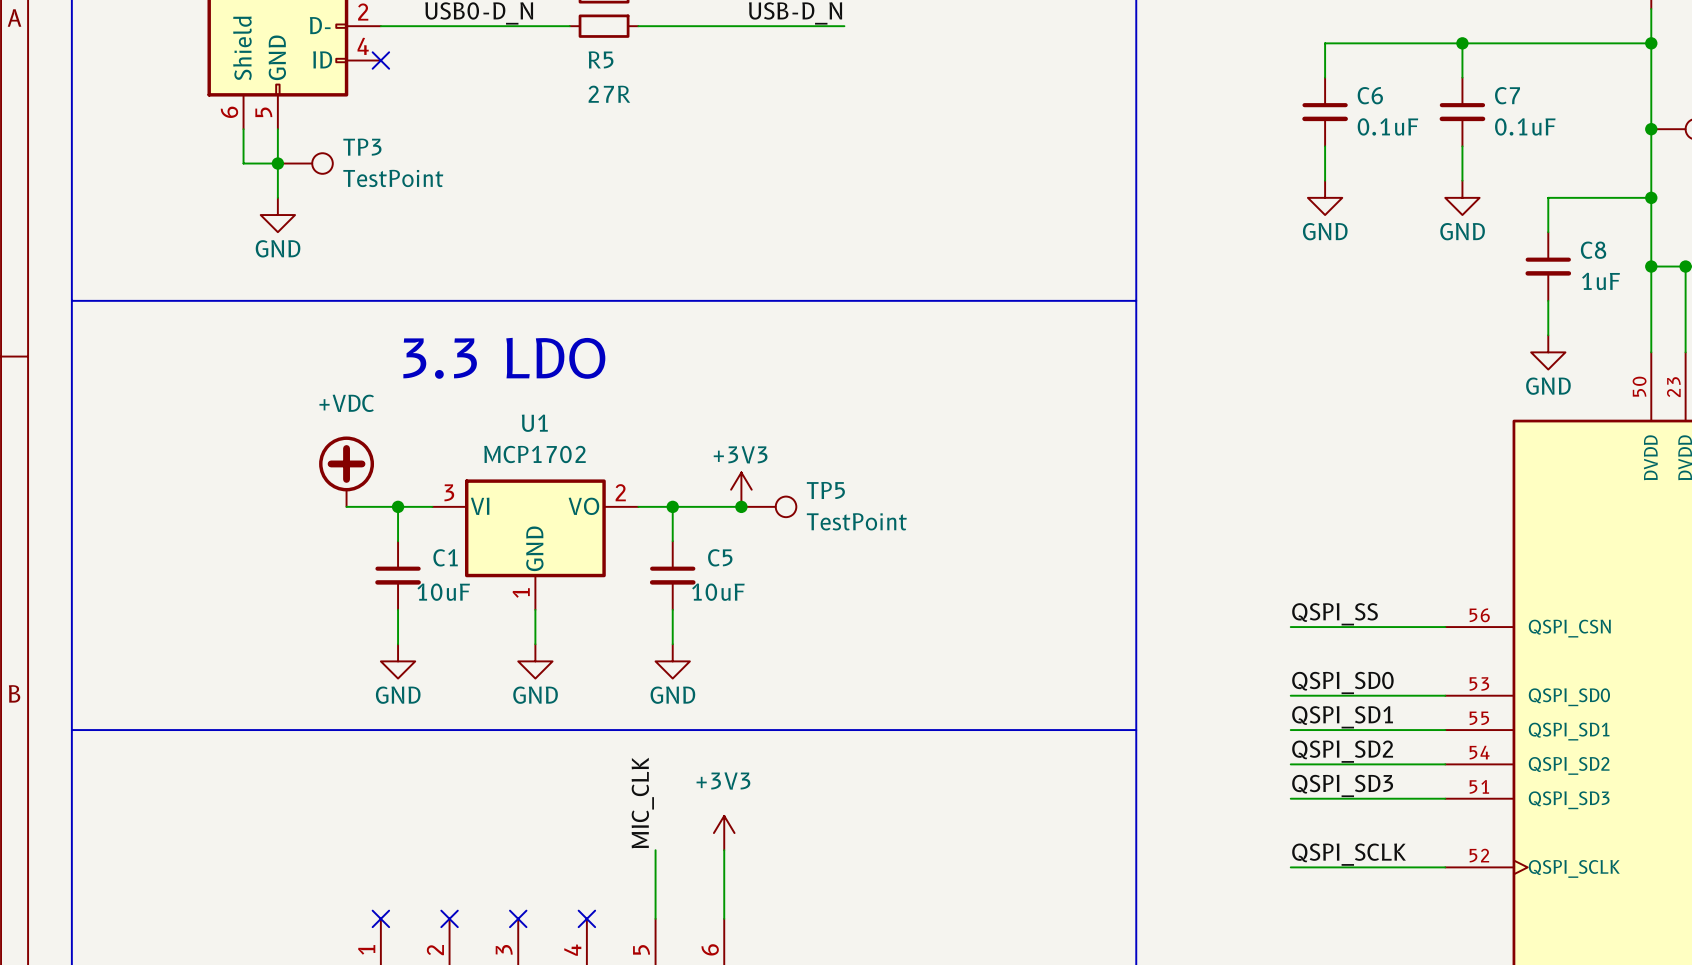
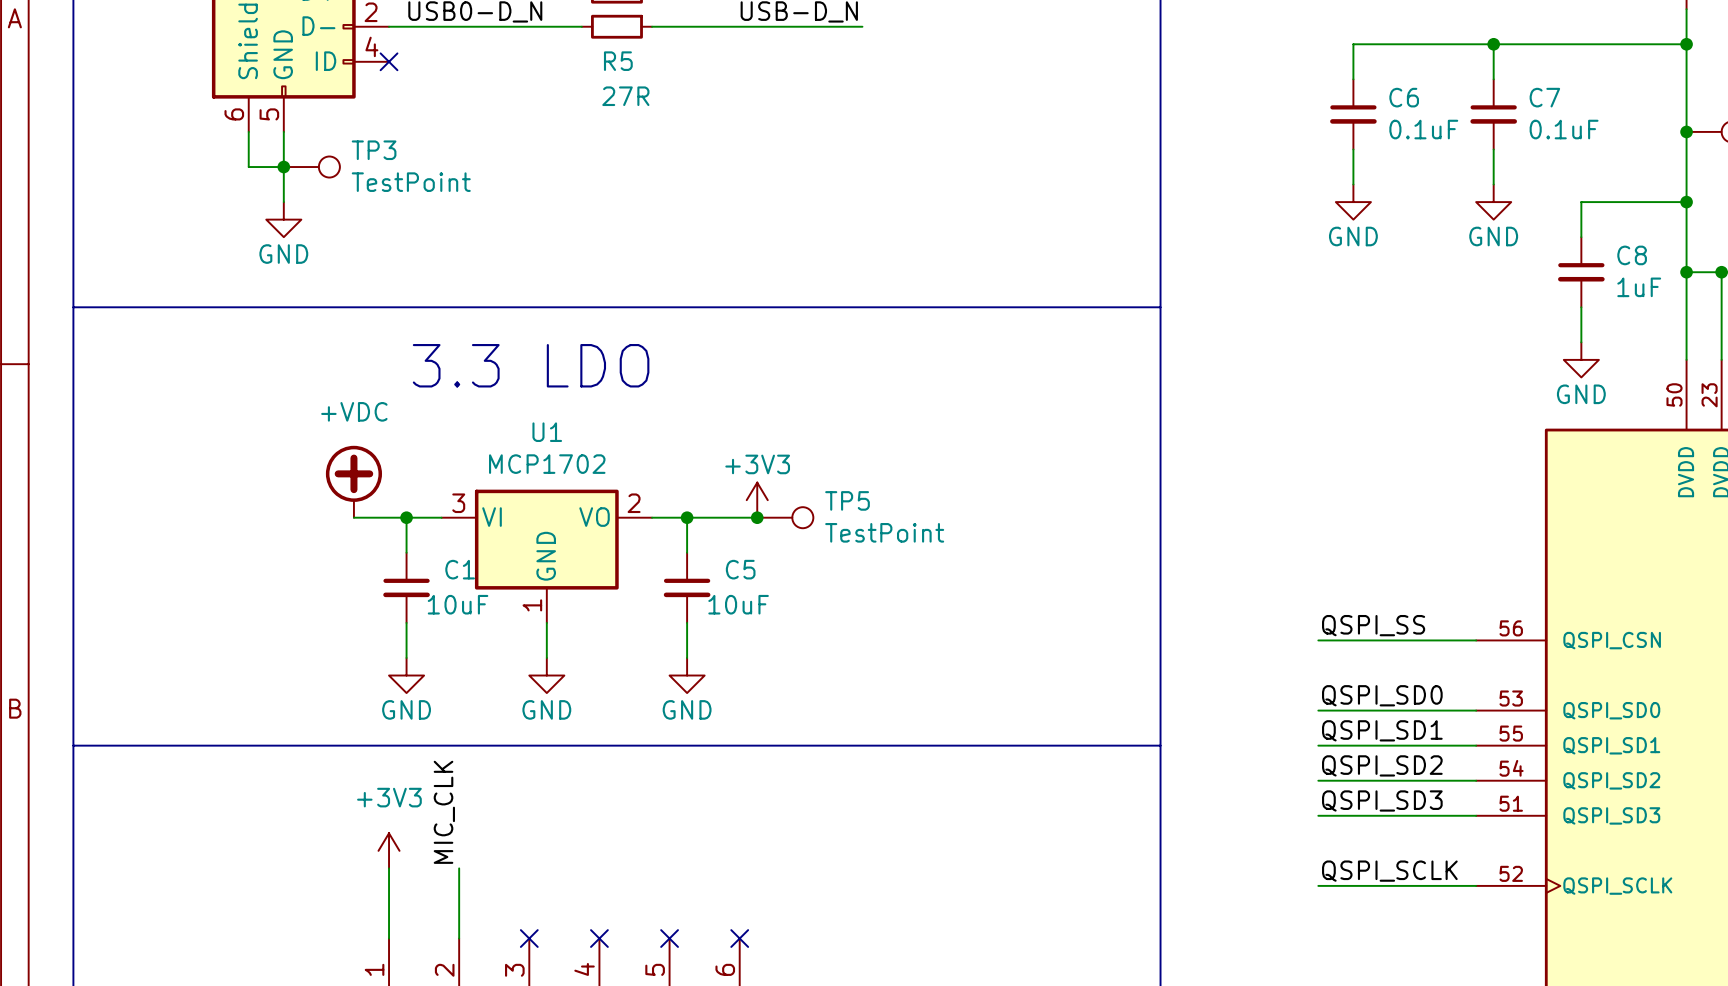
label position: MIC_CLK (642, 803) -> MIC_CLK (444, 812)
power symbol: none -> +3V3 (389, 850)
power symbol: +3V3 (724, 833) -> none
wire: none -> (389, 868) (389, 938)
wire: (655, 850) (655, 918) -> (459, 868) (459, 938)
wire: (724, 850) (724, 918) -> none
no-connect mark: (380, 918) -> none
no-connect mark: (449, 918) -> none
no-connect mark: none -> (669, 938)
no-connect mark: none -> (739, 938)

